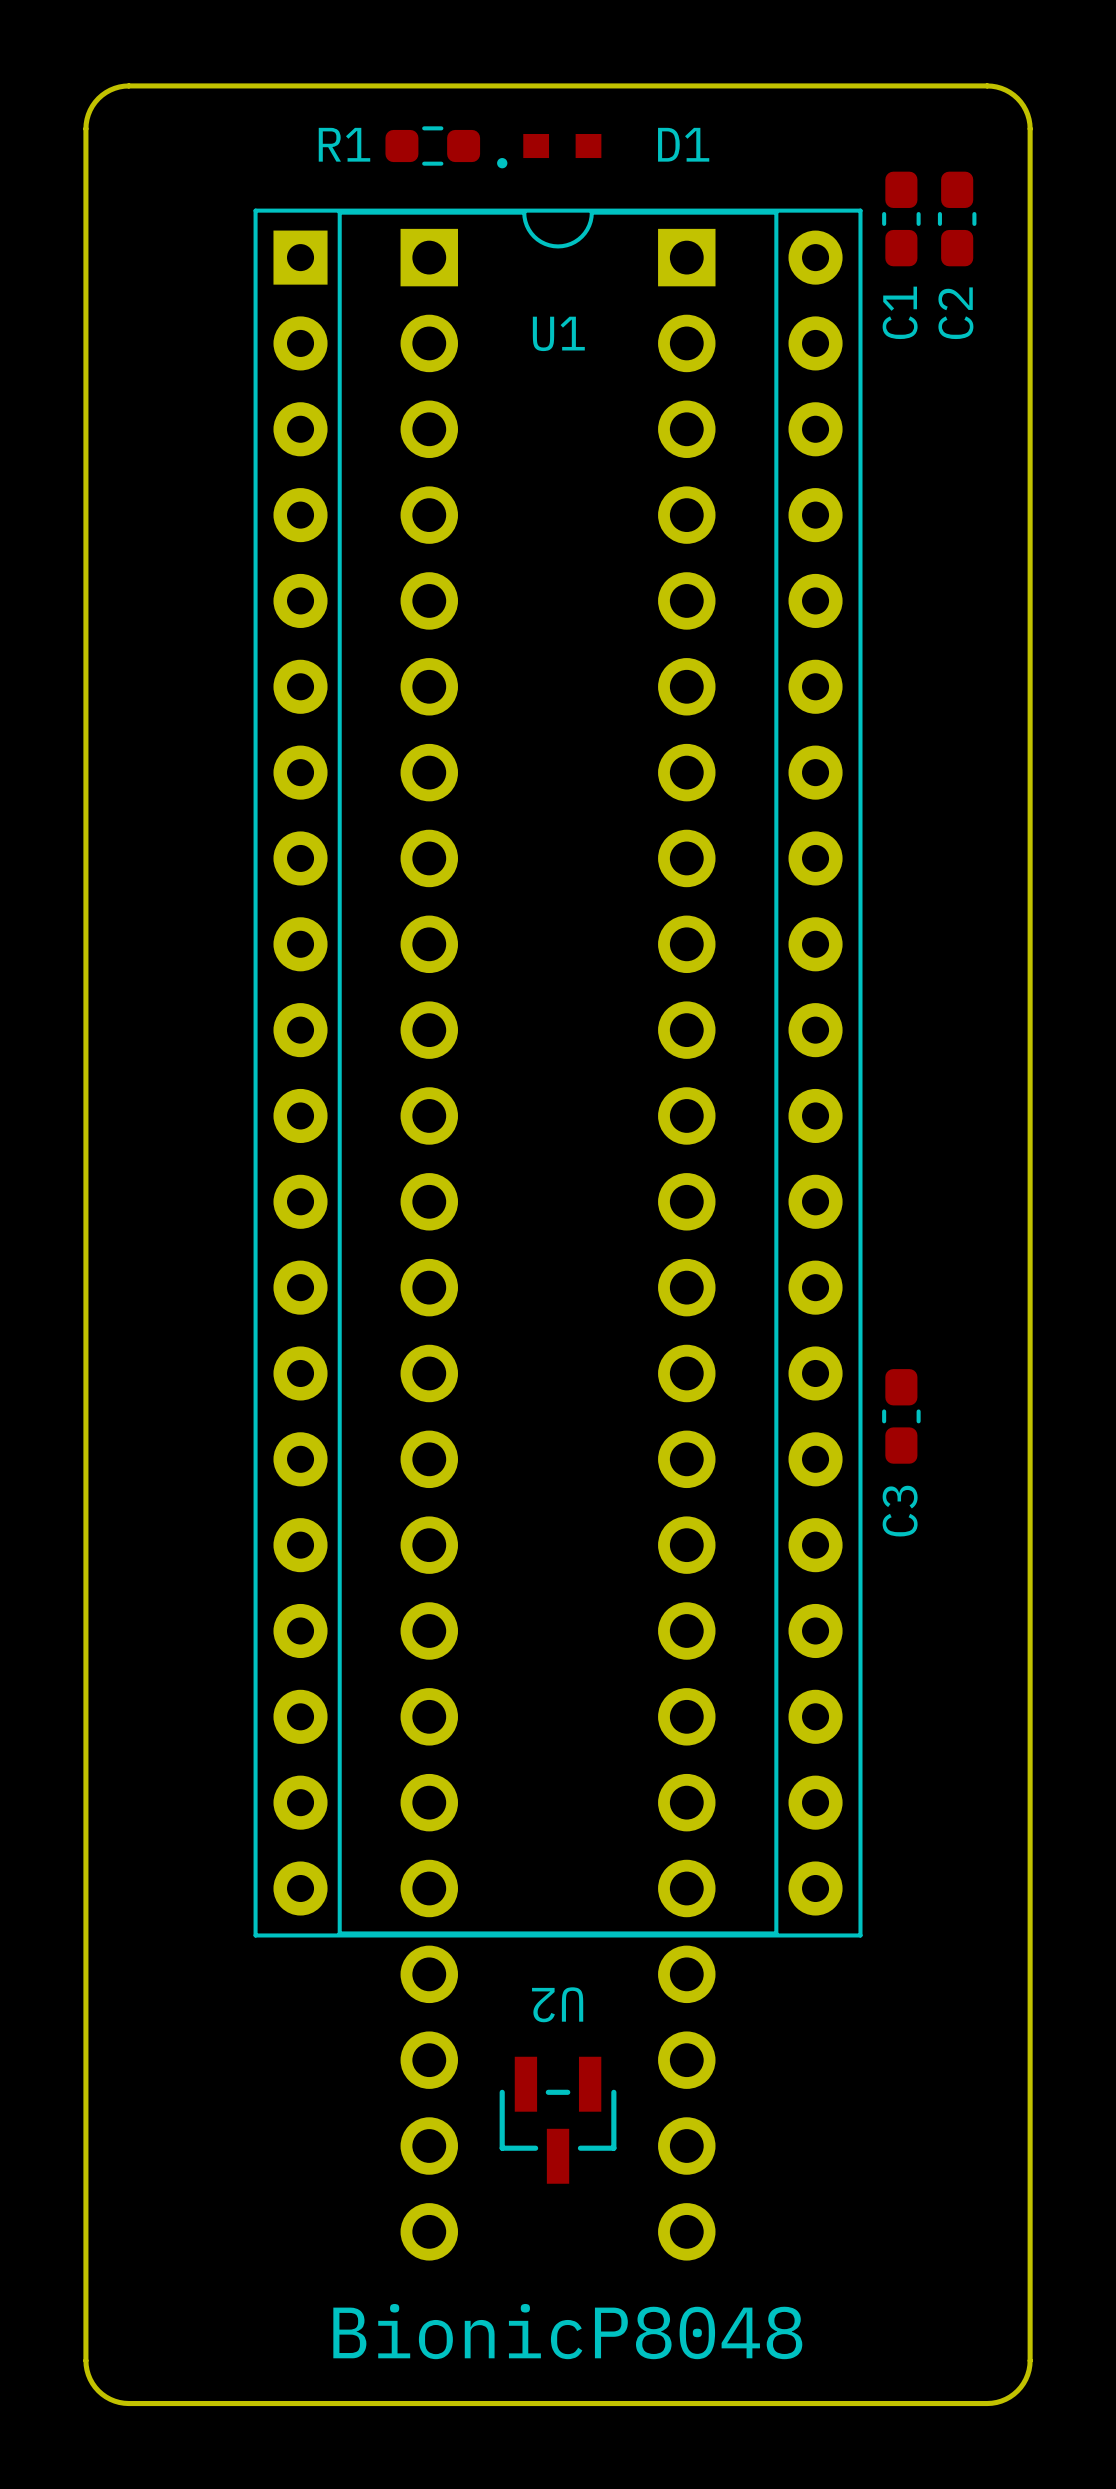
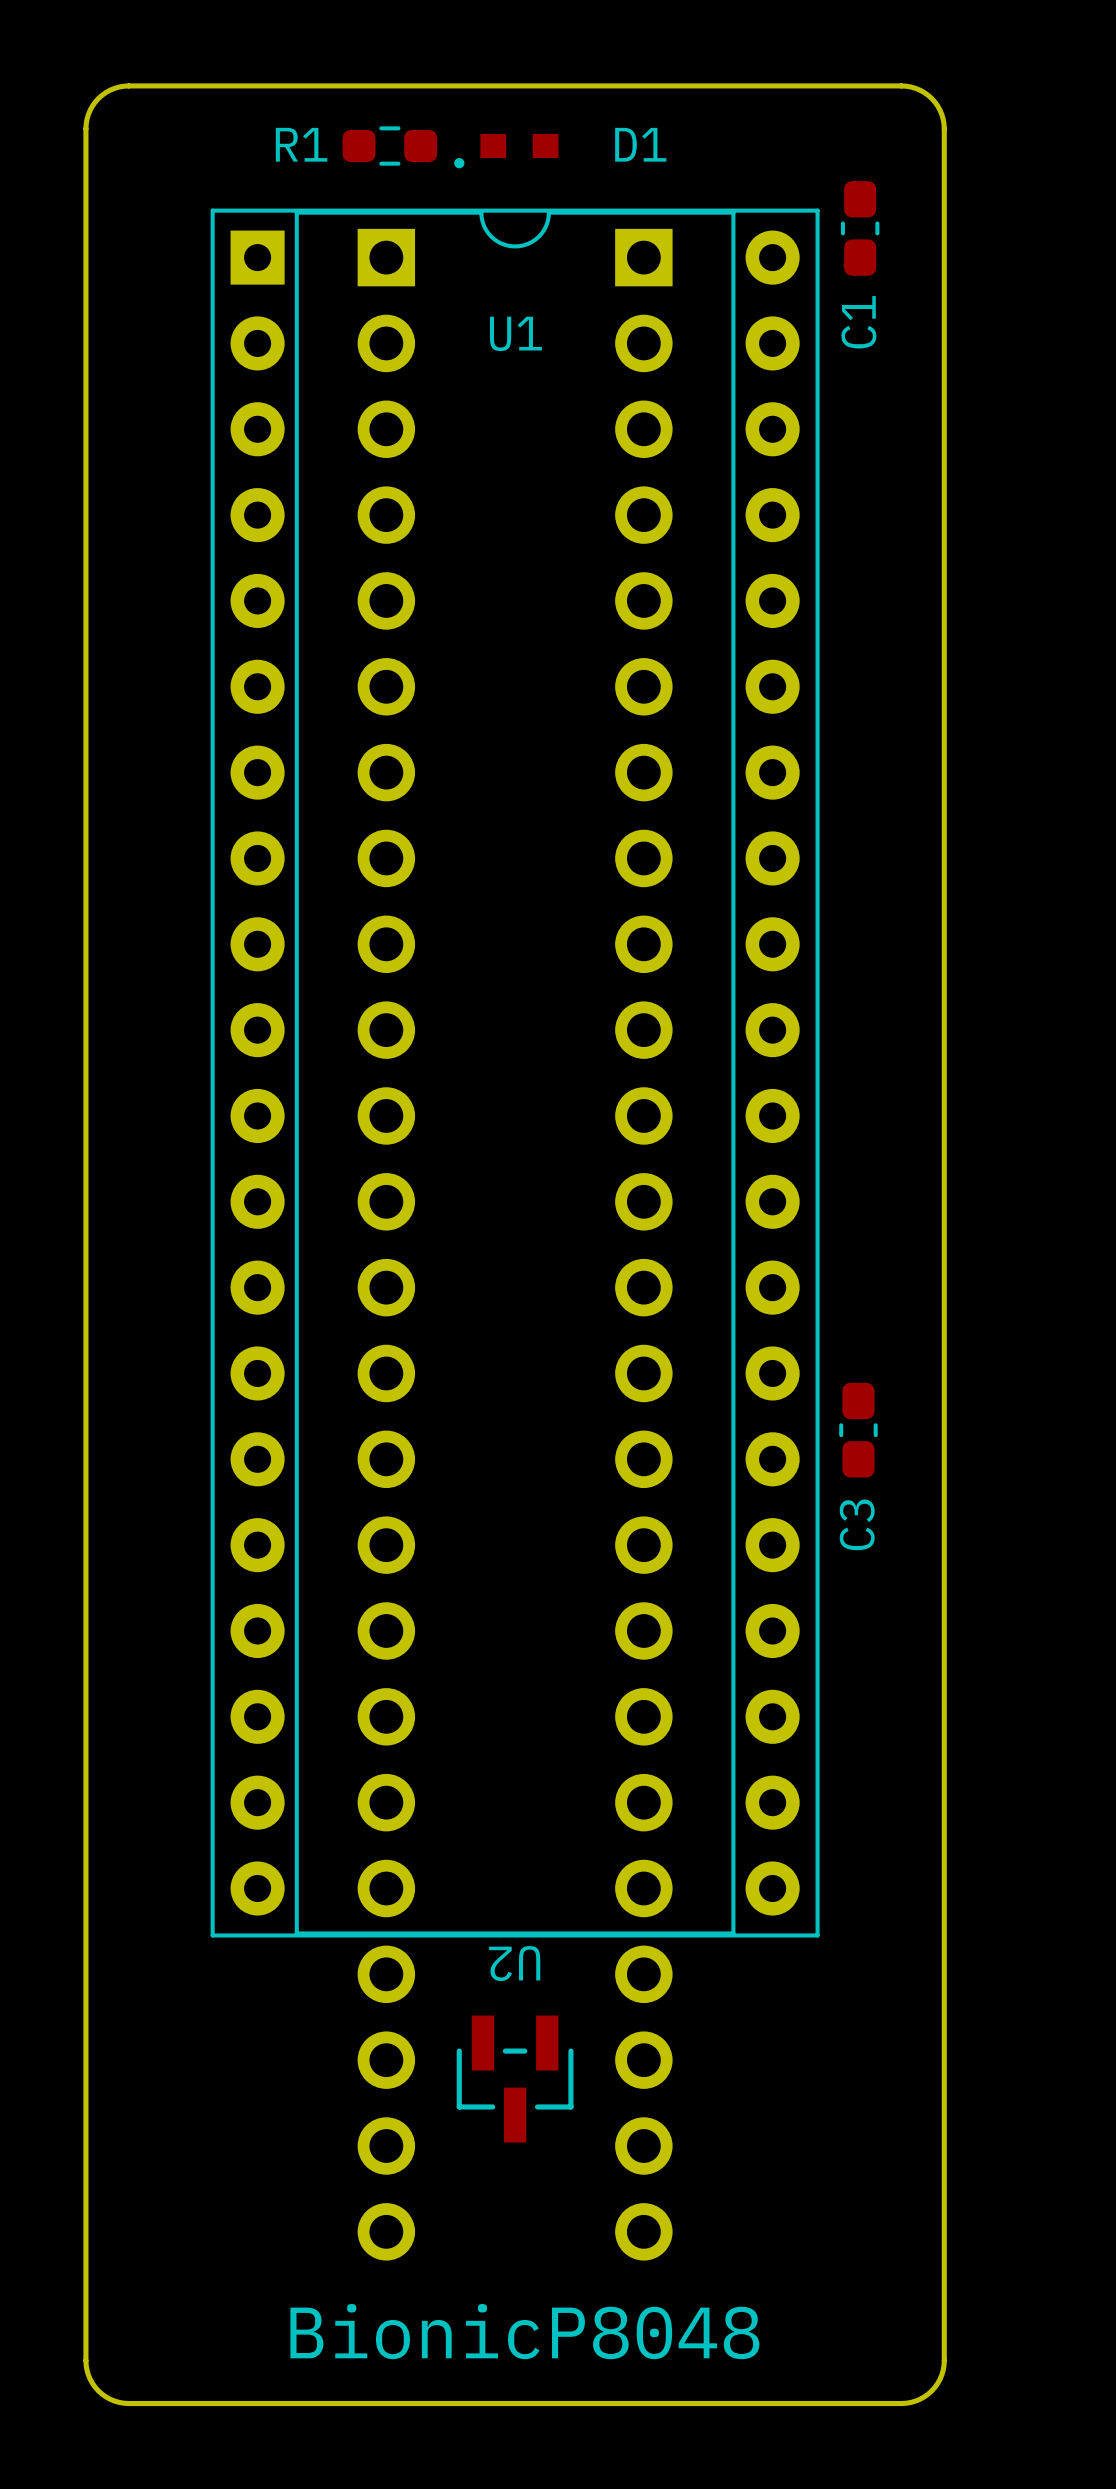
board edge: (901, 85) (987, 85) (1001, 88) (1013, 95) (1023, 106) (1029, 119) (1030, 128) (1029, 2365) (1025, 2379) (1020, 2387) (1013, 2394) (1001, 2401) (987, 2403) (901, 2403) -> (901, 85) (920, 90) (931, 98) (941, 114) (944, 128) (944, 2360) (940, 2379) (931, 2390) (915, 2401) (901, 2403)
R1 position: (432, 146) -> (389, 146)
D1 position: (549, 151) -> (506, 151)
C1 position: (901, 218) -> (860, 228)
C2: (957, 218) -> none
U1 position: (558, 1073) -> (515, 1073)
part position: (429, 1244) -> (386, 1244)
part position: (686, 1244) -> (643, 1244)
C3 position: (901, 1416) -> (858, 1430)
U2 position: (558, 2120) -> (515, 2079)
text position: BionicP8048 (567, 2331) -> BionicP8048 (524, 2331)

